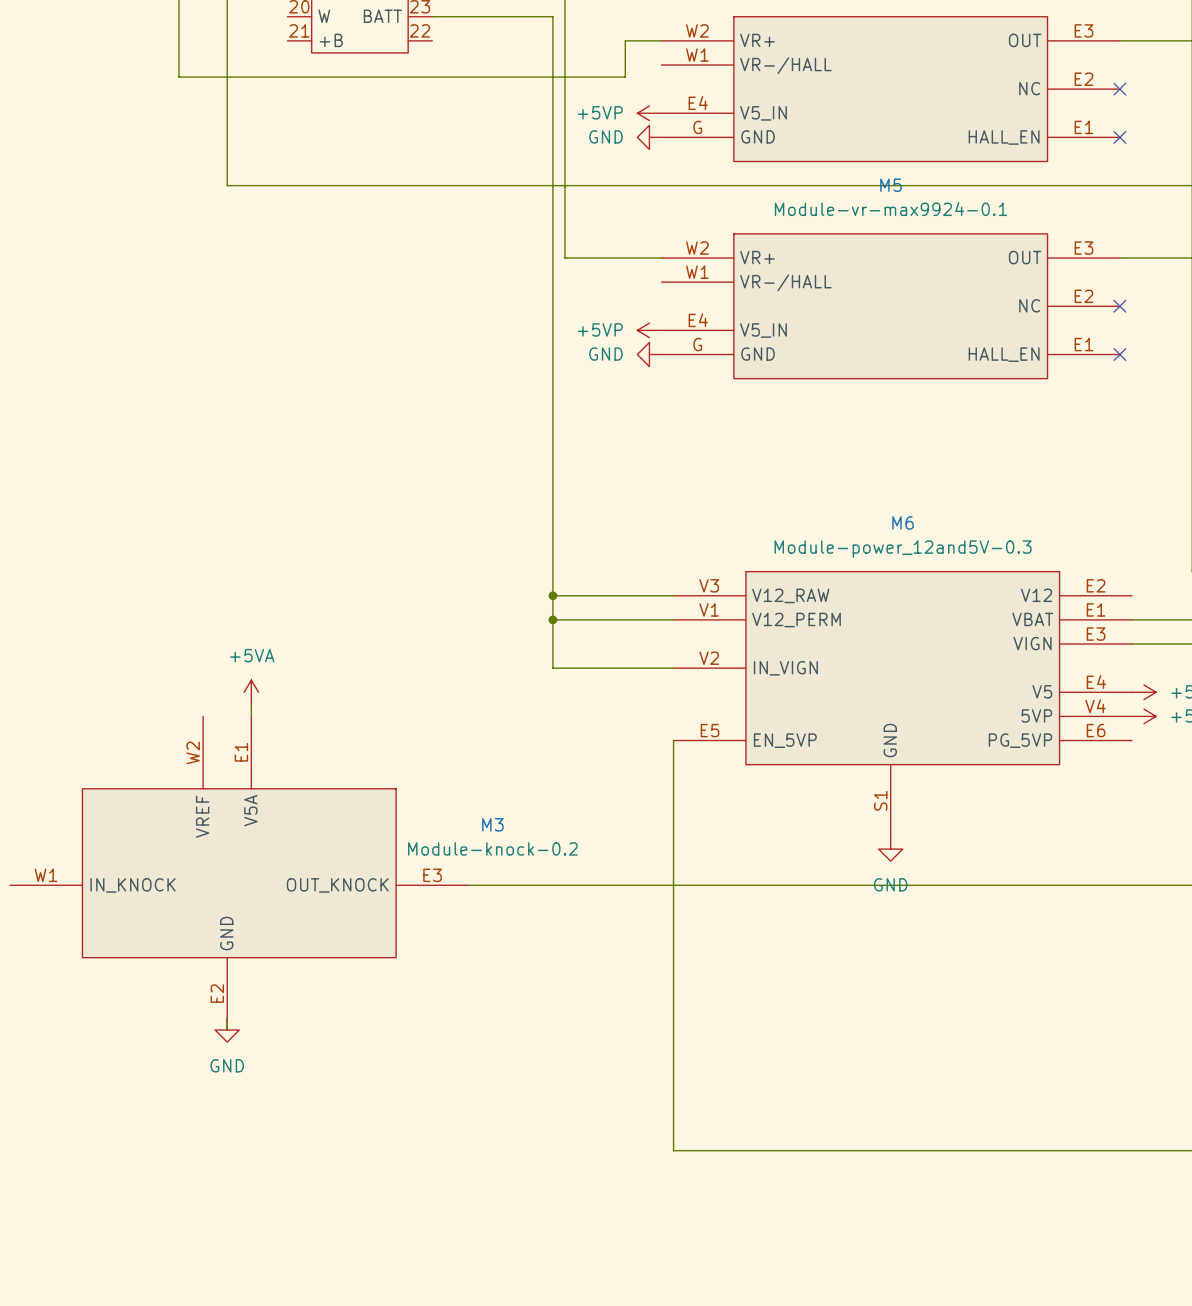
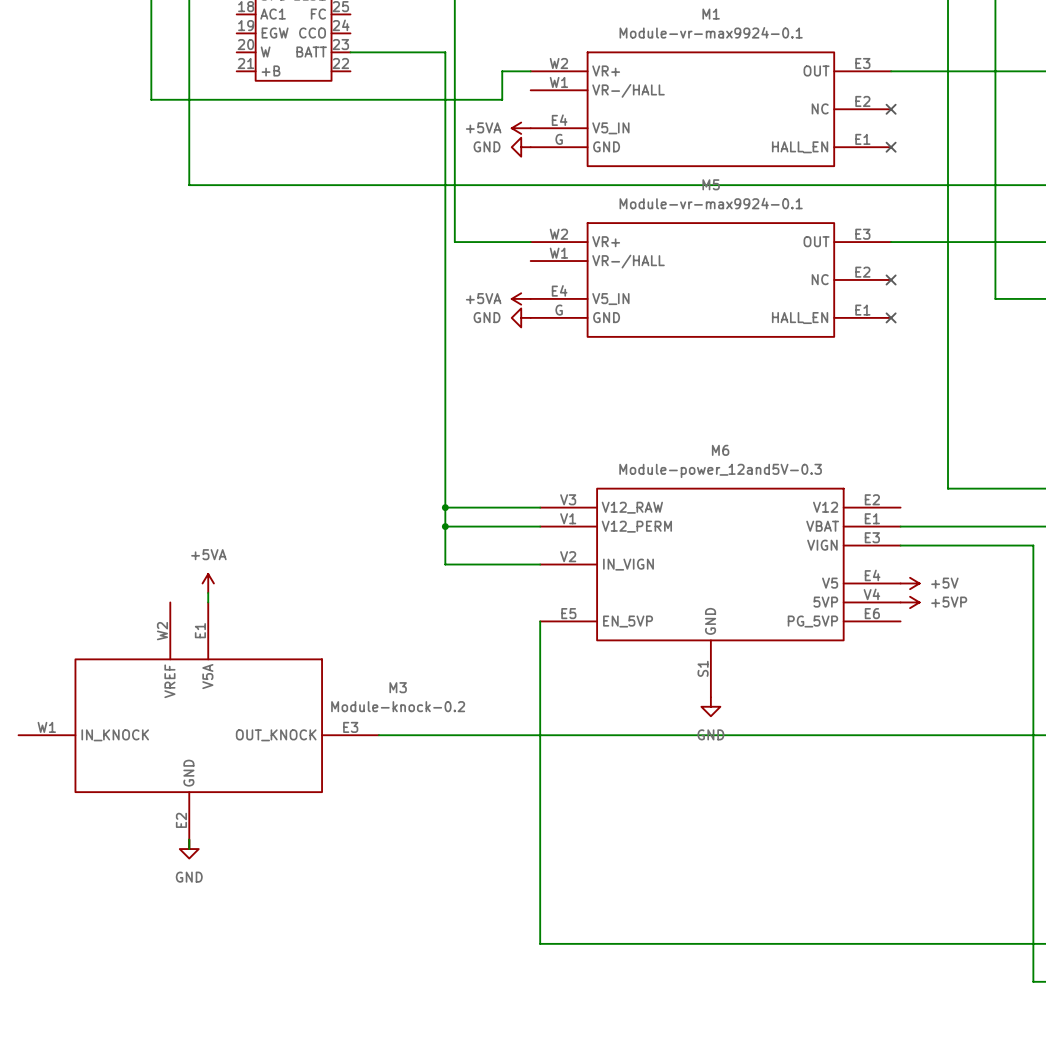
power symbol: +5VP (649, 113) -> +5VA (521, 128)
power symbol: +5VP (649, 330) -> +5VA (521, 298)

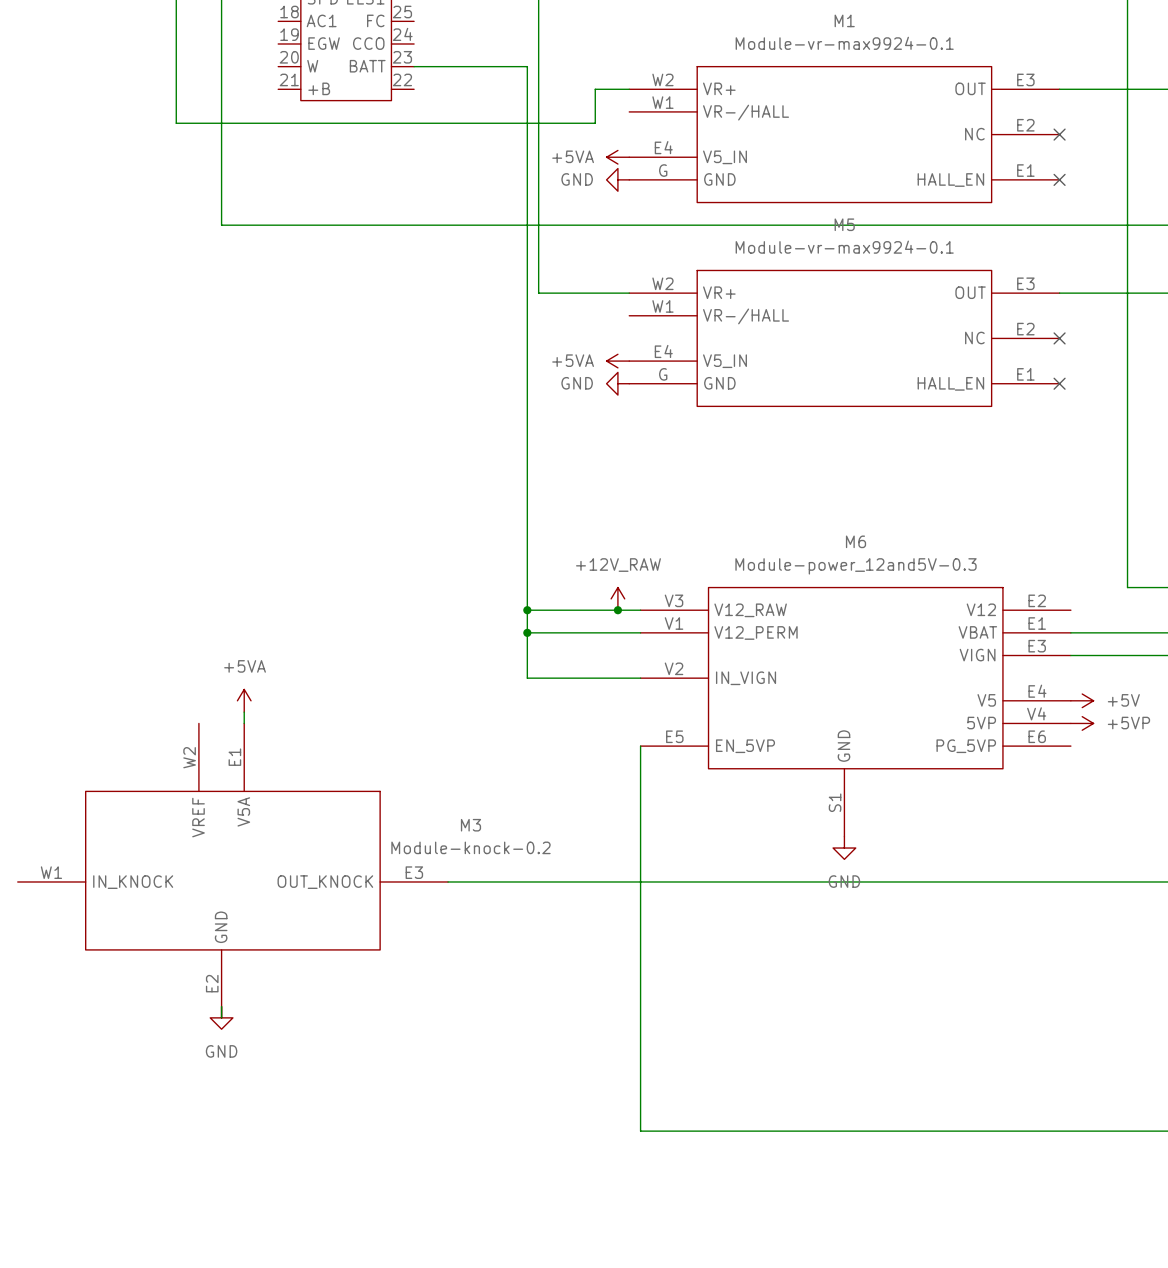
power symbol: none -> +12V_RAW (617, 598)
junction: none -> (617, 610)

